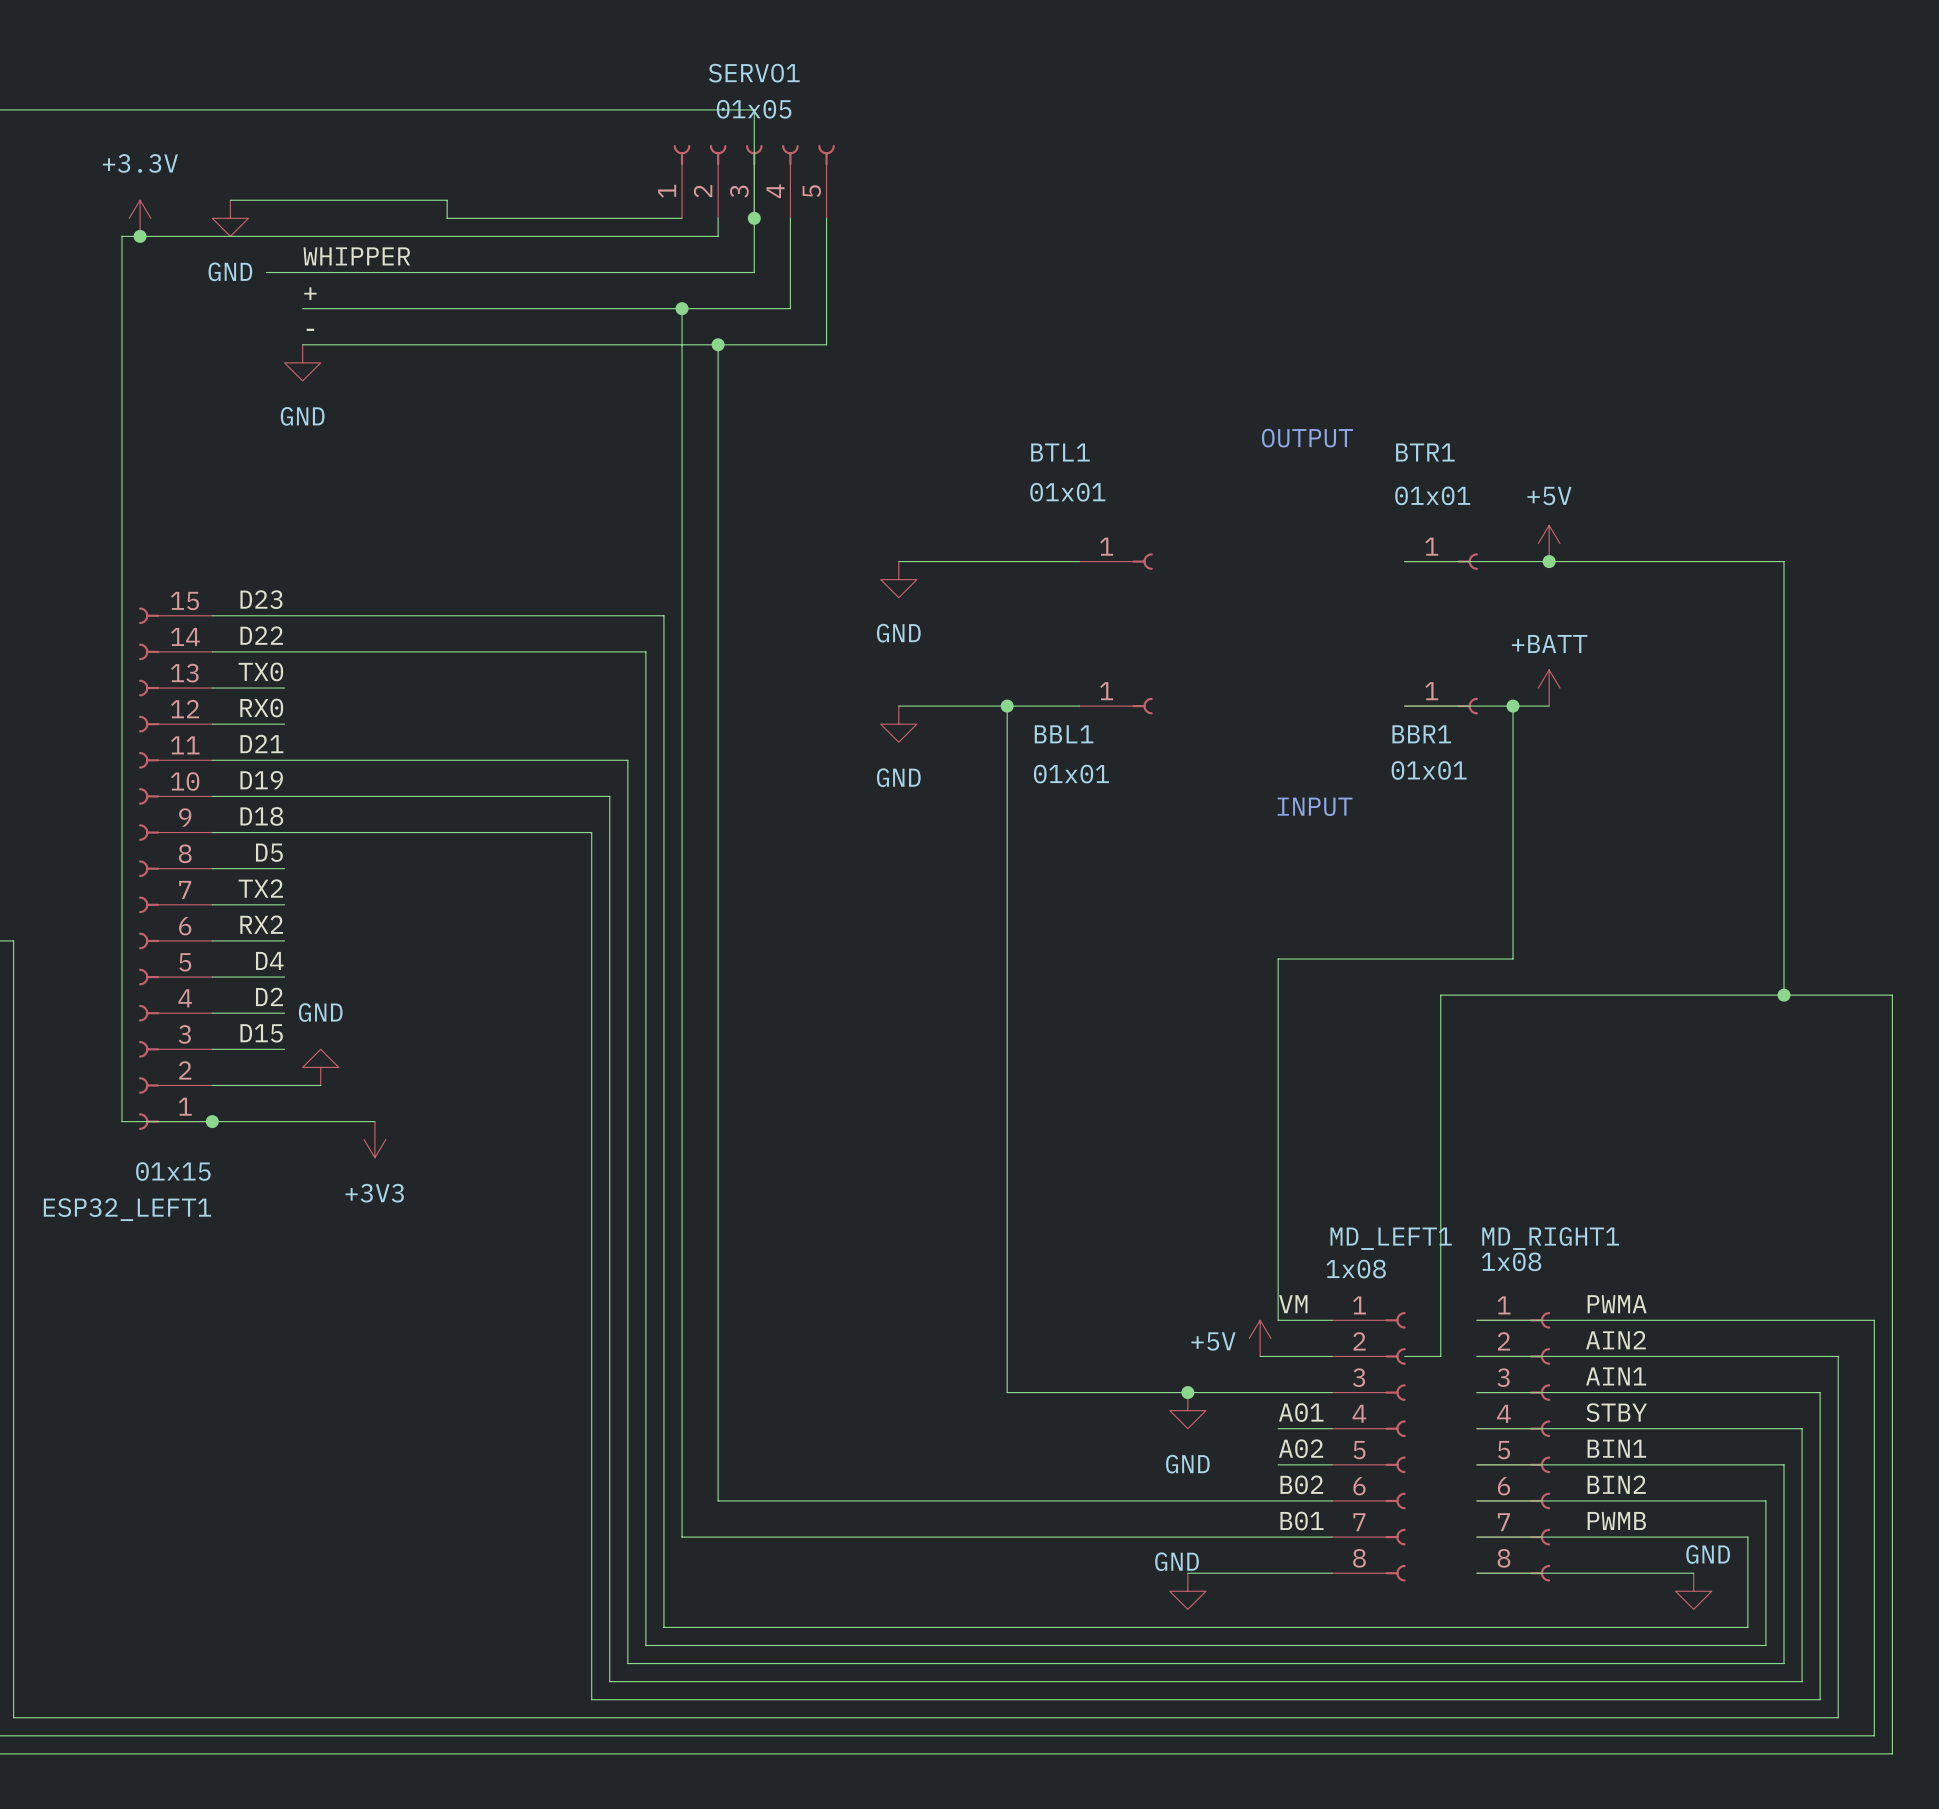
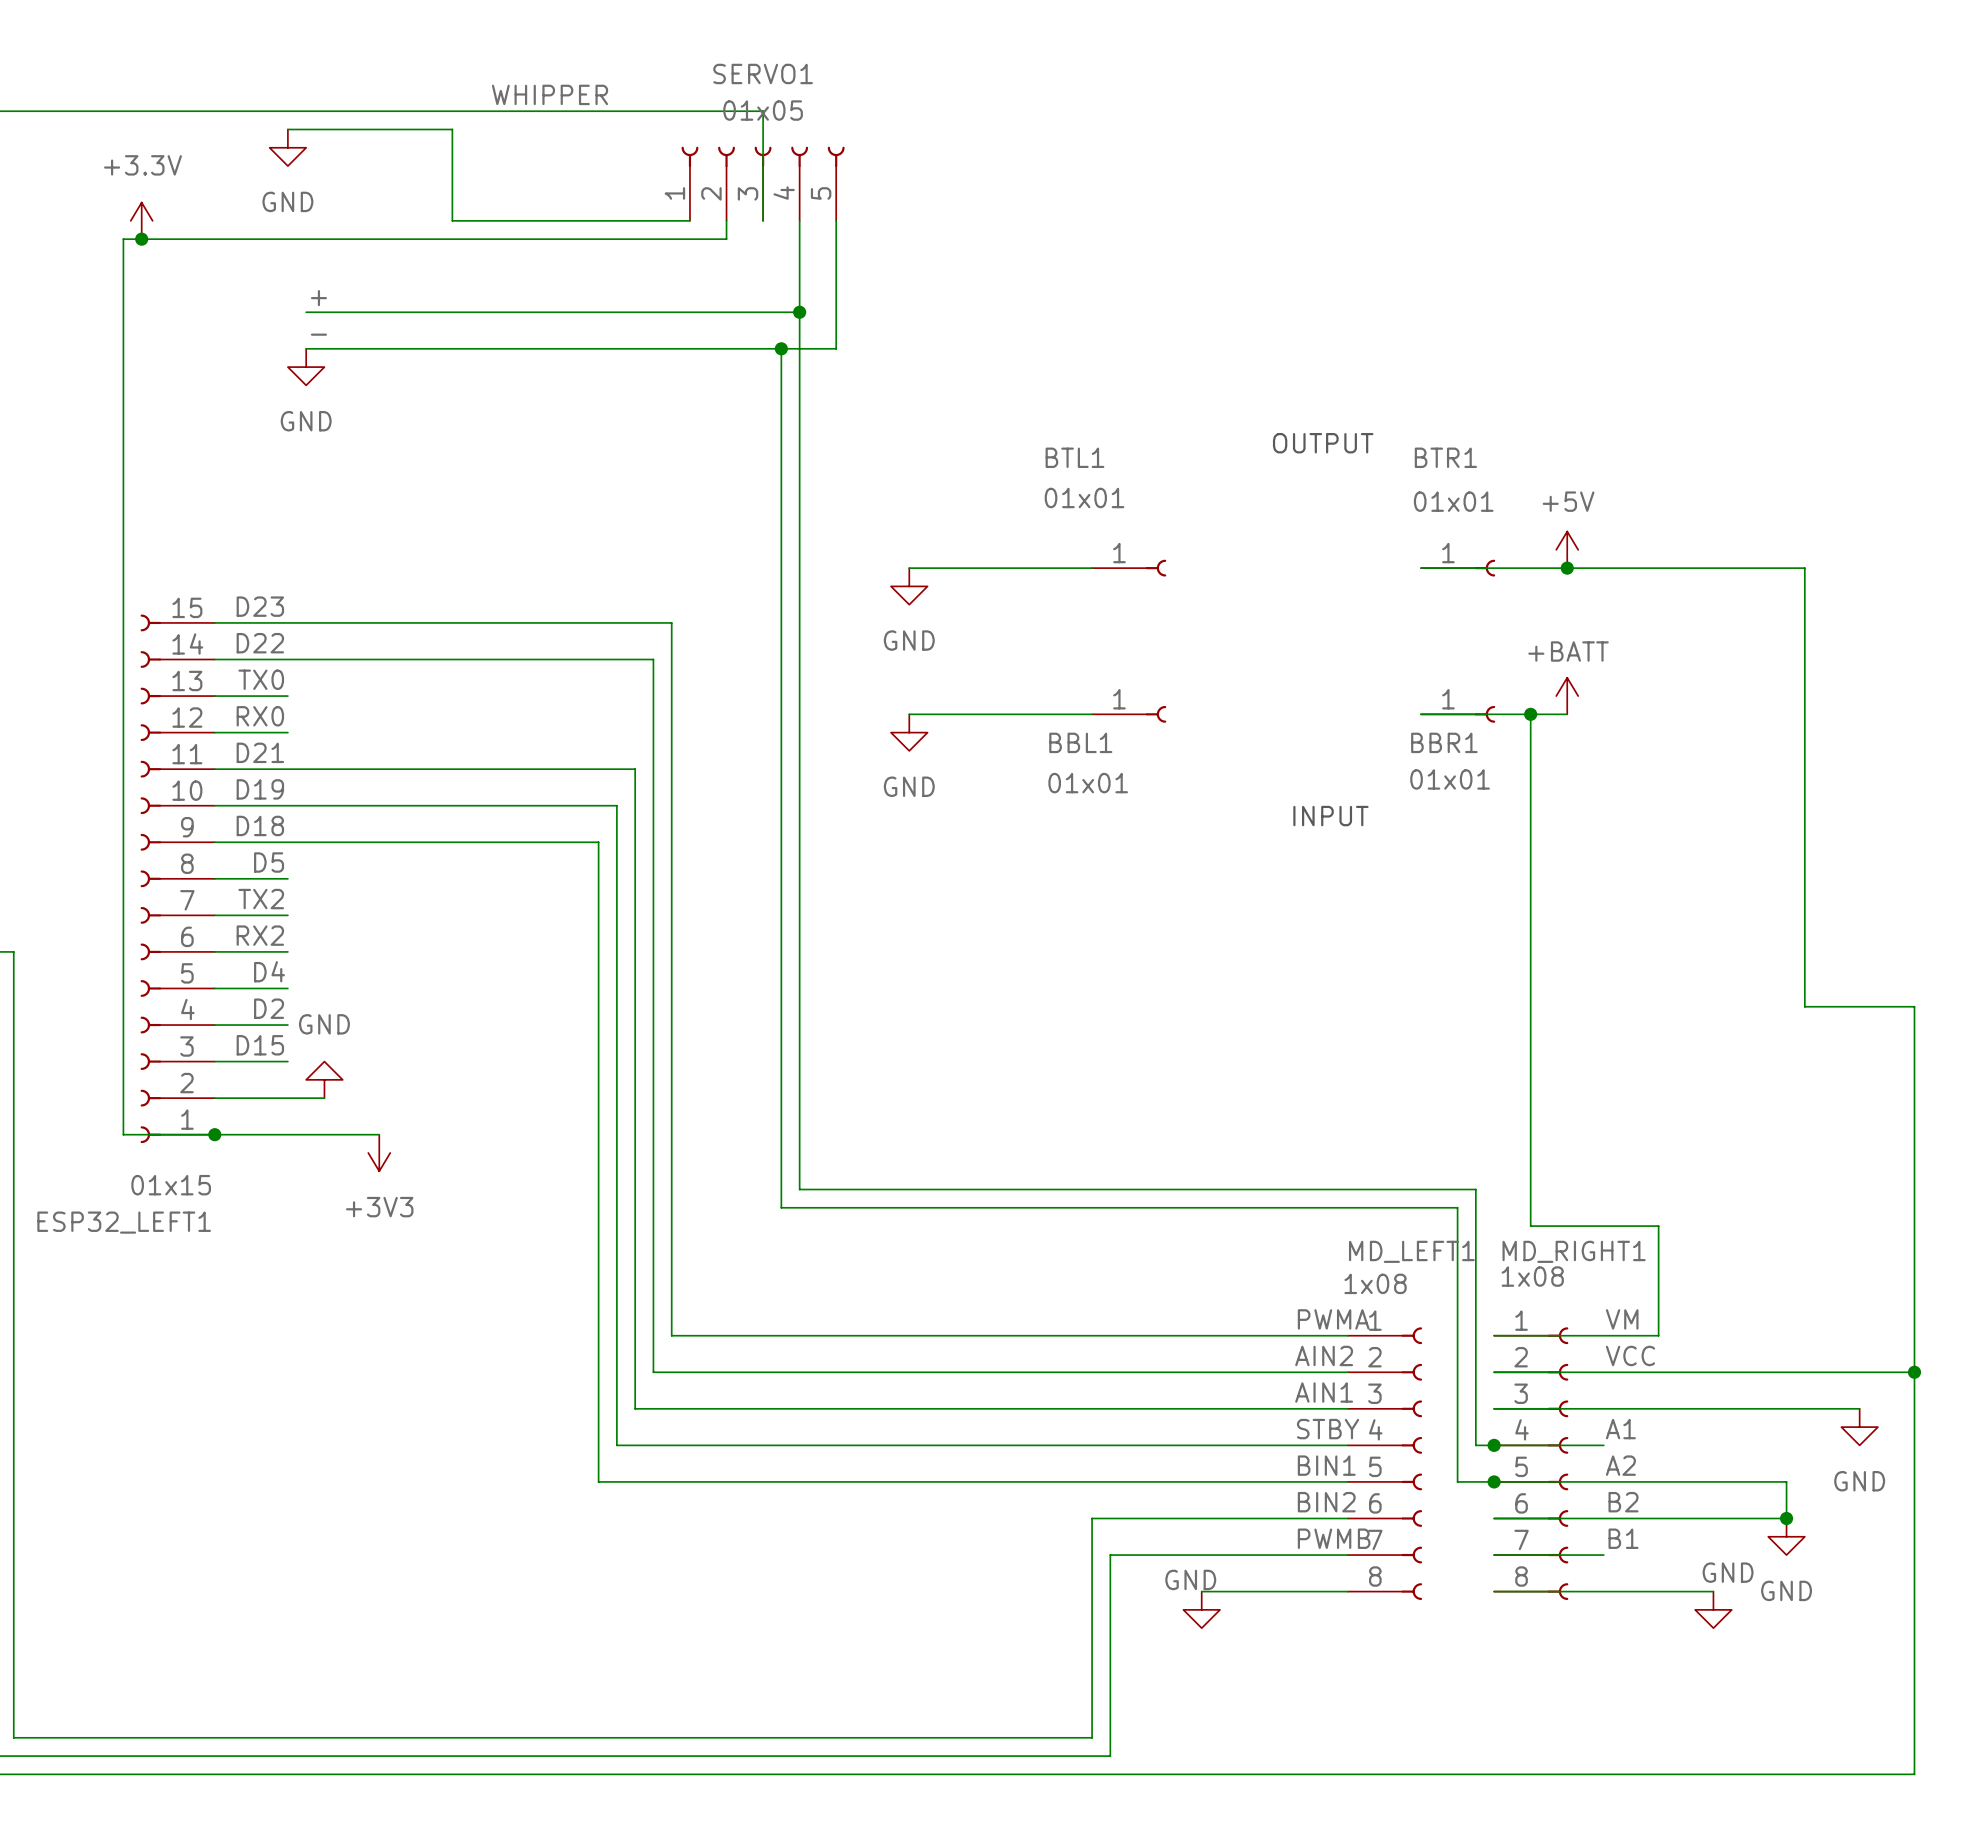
wire: (230, 200) (447, 200) -> (287, 129) (452, 129) (452, 202)
power symbol position: GND (230, 218) -> GND (287, 147)
wire: (754, 218) (754, 272) (266, 272) -> none
junction: (754, 218) -> none
label position: WHIPPER (356, 256) -> WHIPPER (550, 94)
wire: (682, 308) (682, 1537) (1097, 1537) -> none
junction: (682, 308) -> none
wire: none -> (799, 312) (799, 1189) (1475, 1189) (1475, 1445) (1494, 1445)
junction: none -> (799, 312)
wire: (718, 344) (718, 1500) (1079, 1500) -> none
junction: (718, 344) -> none
junction: none -> (781, 348)
wire: (1007, 706) (1007, 1392) -> none
junction: (1007, 706) -> none
wire: (1513, 959) (1278, 959) (1278, 1320) -> (1530, 970) (1530, 1226) (1658, 1226) (1658, 1335)
wire: (1784, 995) (1440, 995) (1440, 1193) -> (781, 348) (781, 1207) (1457, 1207)
junction: (1784, 995) -> none
label: VM (1293, 1304) -> PWMA (1333, 1319)
label: PWMA (1617, 1304) -> VM (1622, 1319)
wire: (663, 1320) (663, 1627) (1747, 1627) (1747, 1537) (1585, 1537) -> (671, 1335) (1293, 1335)
wire: (1639, 1320) (1874, 1320) (1874, 1735) (1097, 1735) -> (1110, 1555) (1110, 1756)
power symbol: +5V (1260, 1338) -> none
label: none -> AIN2 (1324, 1355)
label: AIN2 (1615, 1340) -> VCC (1630, 1355)
wire: (645, 1356) (645, 1645) (1765, 1645) (1765, 1500) -> (653, 1372) (1274, 1372)
wire: (1404, 1356) (1440, 1356) -> (1494, 1481) (1457, 1481) (1457, 1372)
wire: (1838, 1356) (1838, 1717) (1079, 1717) -> (1092, 1518) (1092, 1737)
wire: none -> (1859, 1372) (1914, 1372)
junction: none -> (1914, 1372)
label position: AIN1 (1616, 1376) -> AIN1 (1324, 1392)
wire: (627, 1392) (627, 1663) (1784, 1663) (1784, 1464) (1765, 1464) -> (635, 1408) (1018, 1408)
junction: (1187, 1392) -> none
wire: (1820, 1392) (1820, 1699) (591, 1699) (591, 1464) -> (1293, 1481) (598, 1481)
wire: none -> (1841, 1408) (1859, 1408)
power symbol: GND (1187, 1410) -> none
power symbol: none -> GND (1859, 1427)
label: A01 (1301, 1412) -> STBY (1328, 1429)
label: STBY (1616, 1412) -> A1 (1620, 1429)
wire: (609, 1428) (609, 1681) (1802, 1681) (1802, 1428) (1585, 1428) -> (616, 1445) (1293, 1445)
junction: none -> (1494, 1445)
label: A02 (1301, 1448) -> BIN1 (1326, 1465)
label: BIN1 (1616, 1448) -> A2 (1620, 1465)
junction: none -> (1494, 1481)
wire: none -> (1786, 1481) (1786, 1518)
label: B02 (1301, 1484) -> BIN2 (1326, 1502)
label: BIN2 (1616, 1484) -> B2 (1623, 1502)
junction: none -> (1786, 1518)
power symbol: none -> GND (1786, 1536)
label: B01 (1302, 1520) -> PWMB (1334, 1538)
label: PWMB (1616, 1520) -> B1 (1623, 1538)

